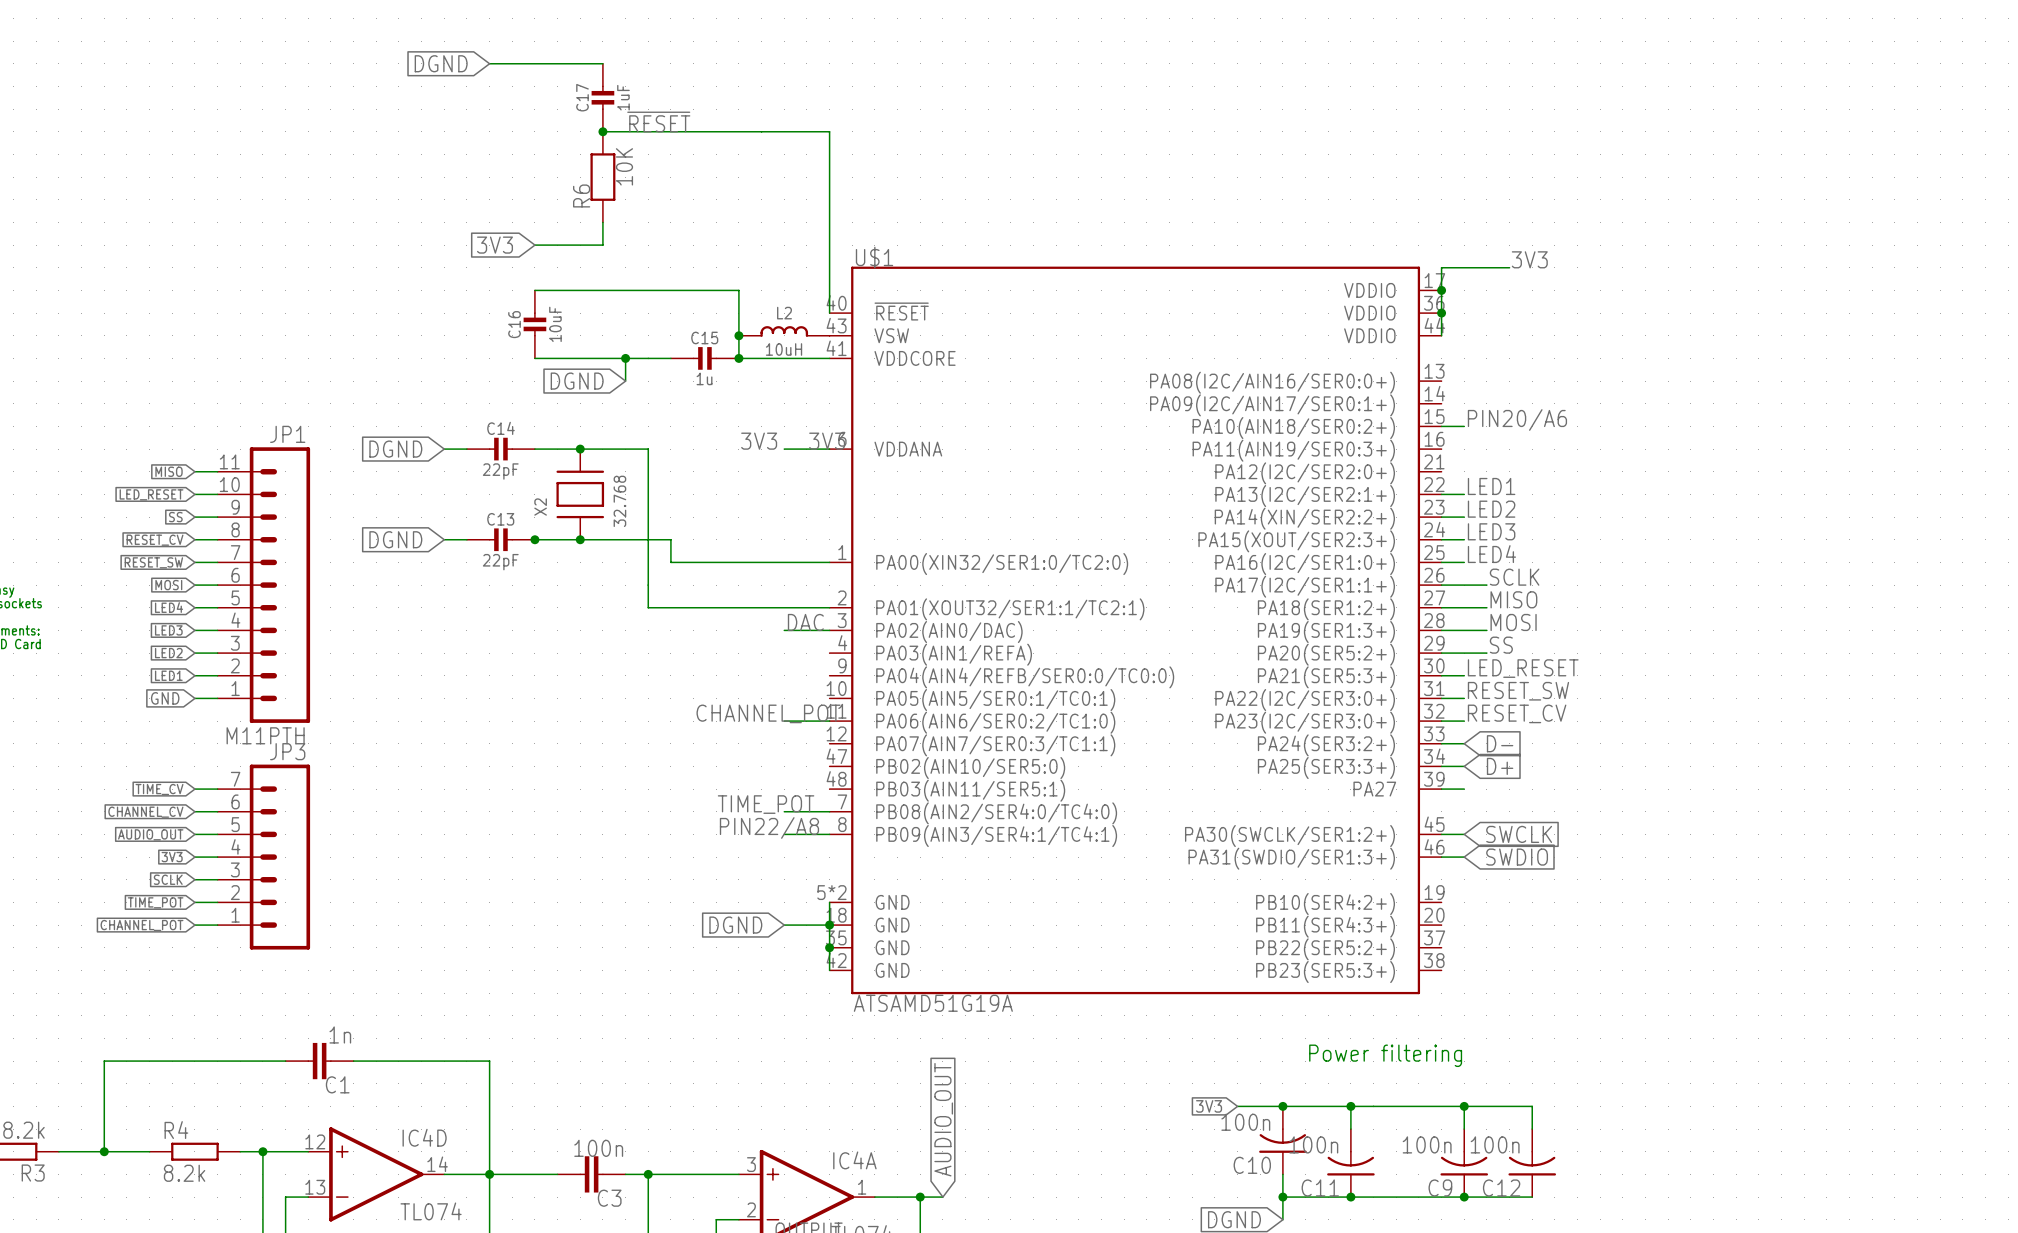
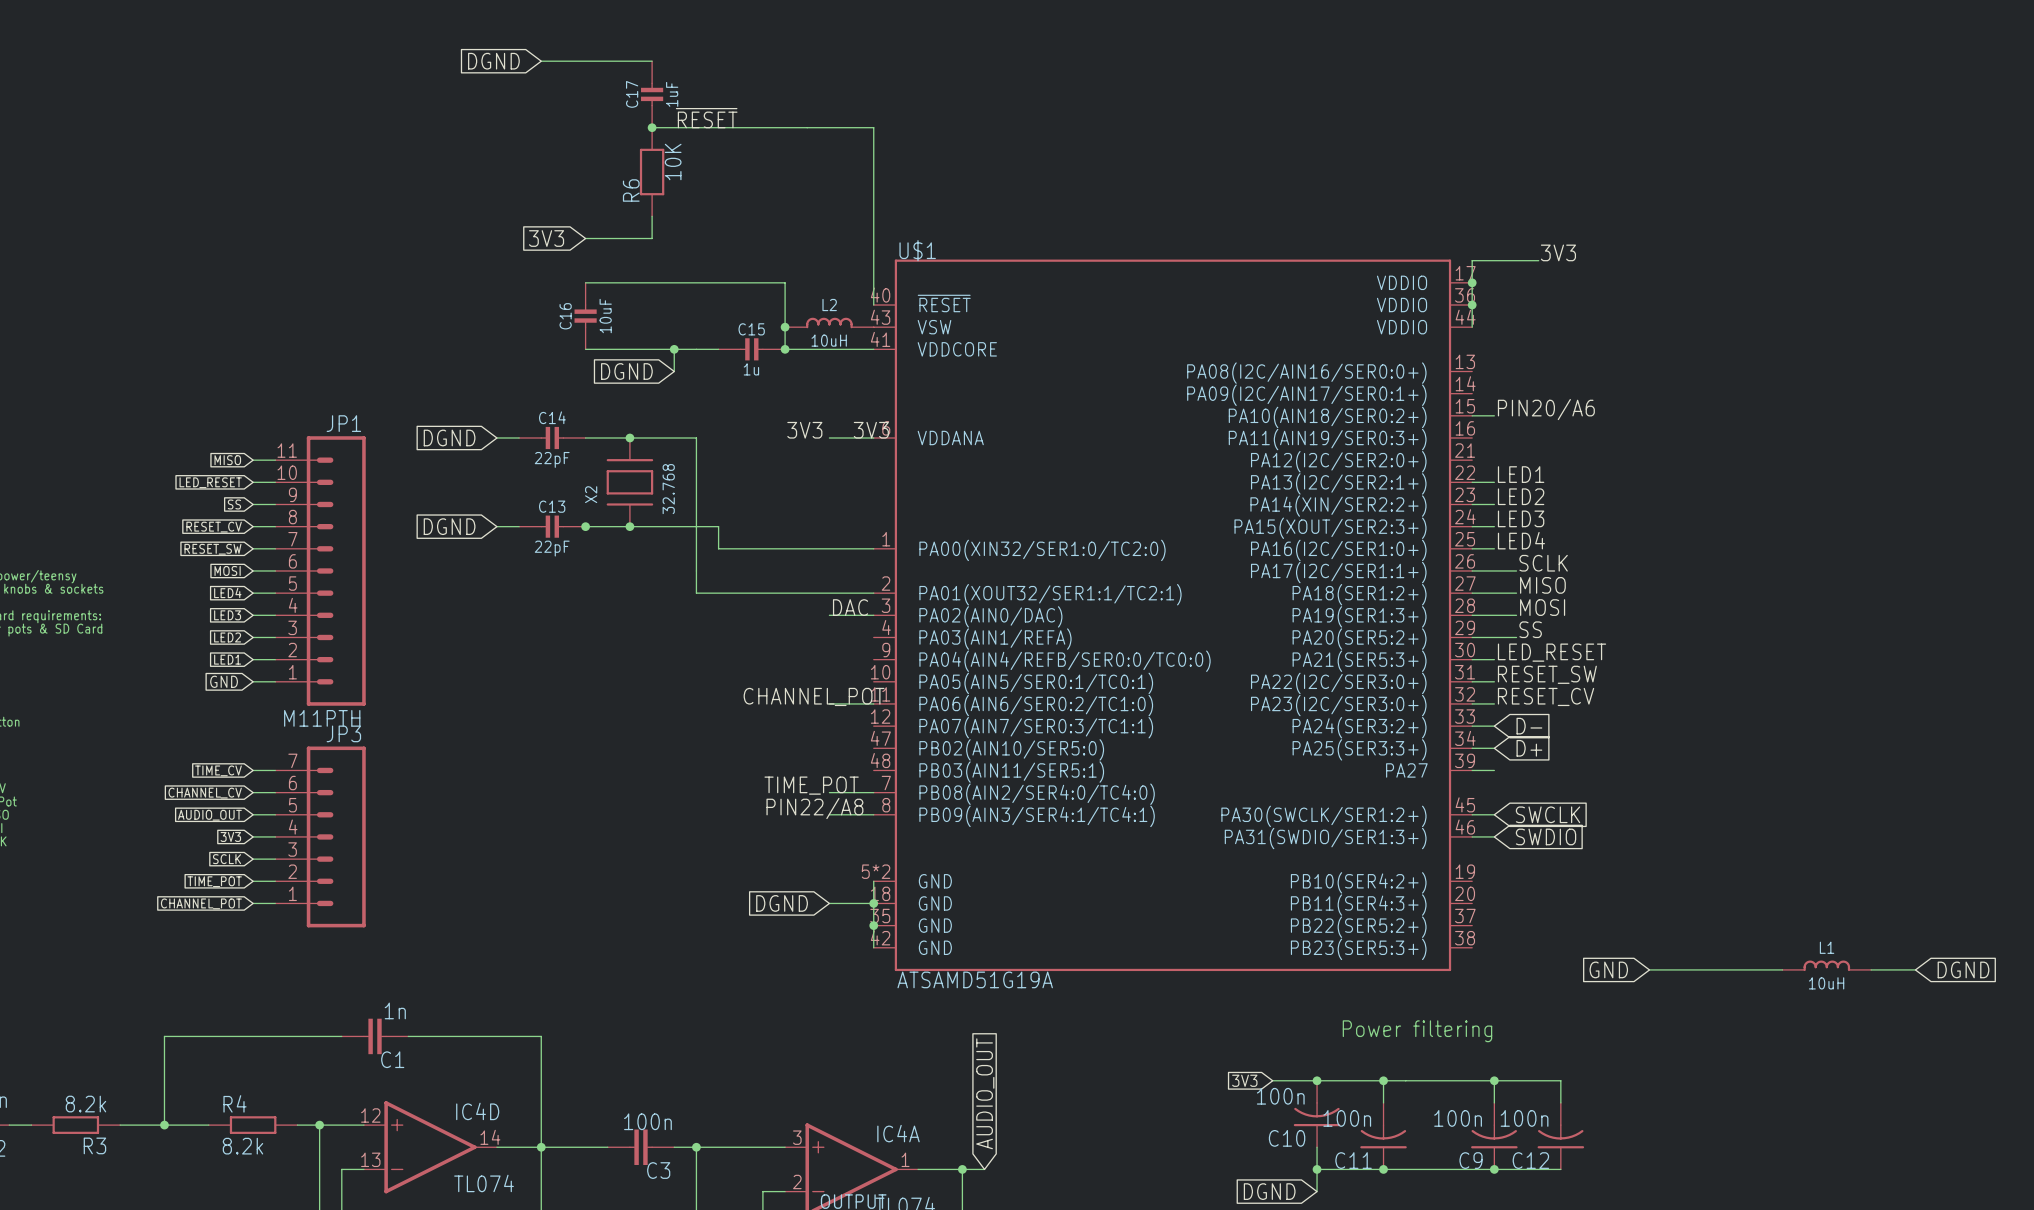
L1: none -> 10uH (1826, 965)
global label: none -> GND (1608, 969)
wire: none -> (1649, 969) (1782, 969)
wire: none -> (1871, 969) (1915, 969)
global label: none -> DGND (1963, 969)

